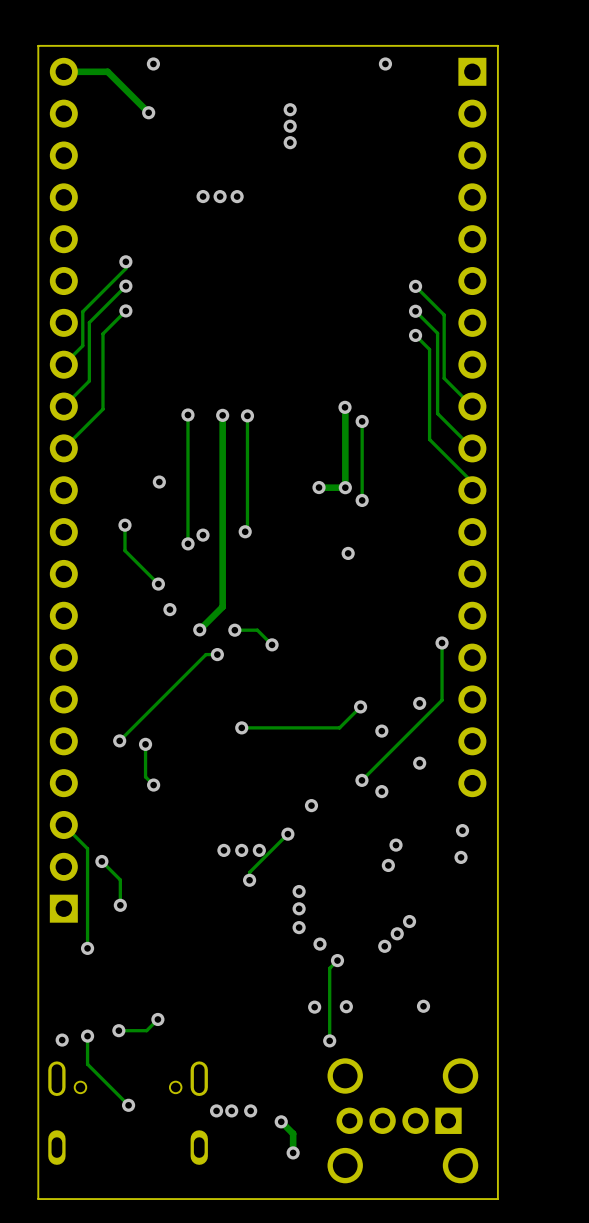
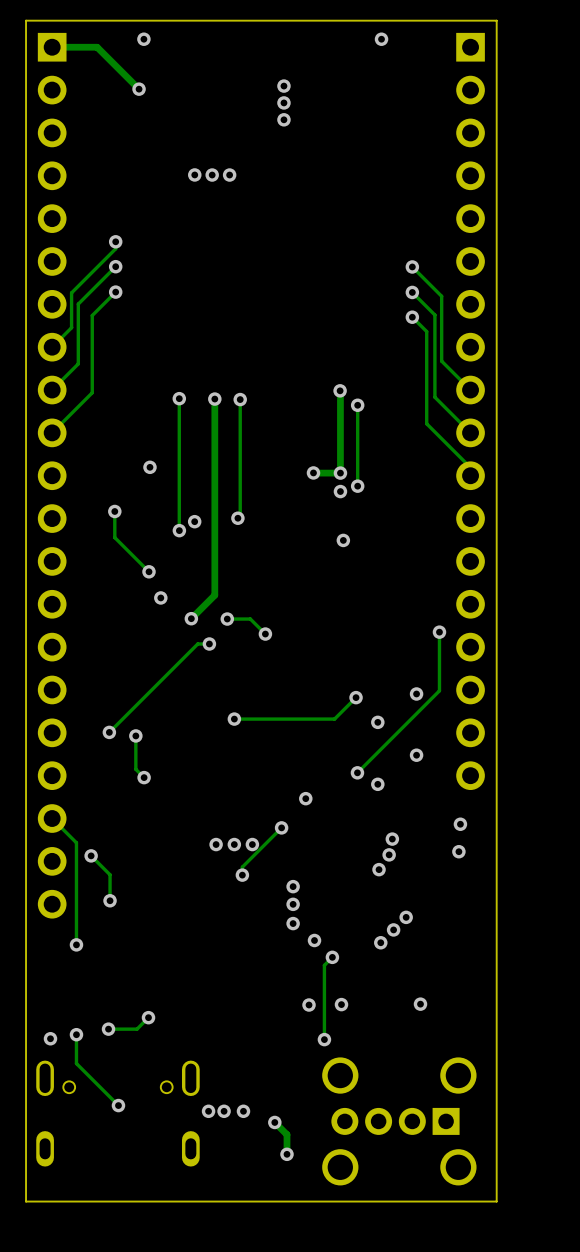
part rotation: 0° (63, 490) -> 180° (52, 475)
via: none -> (340, 491)
via: none -> (389, 854)
via: (388, 865) -> none
via: none -> (379, 869)

